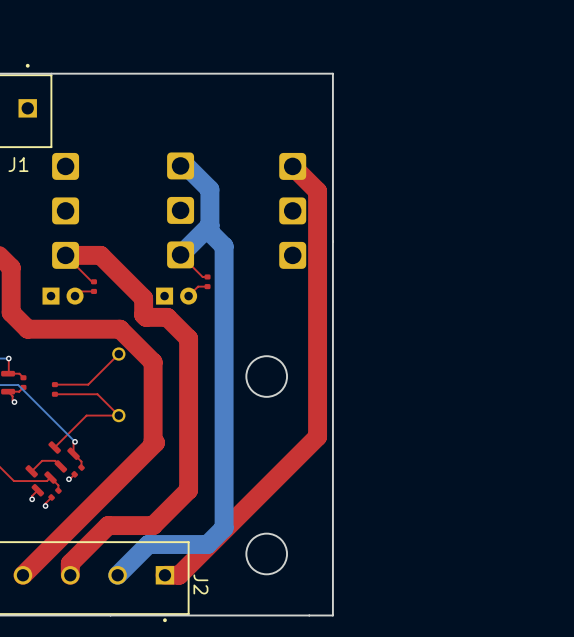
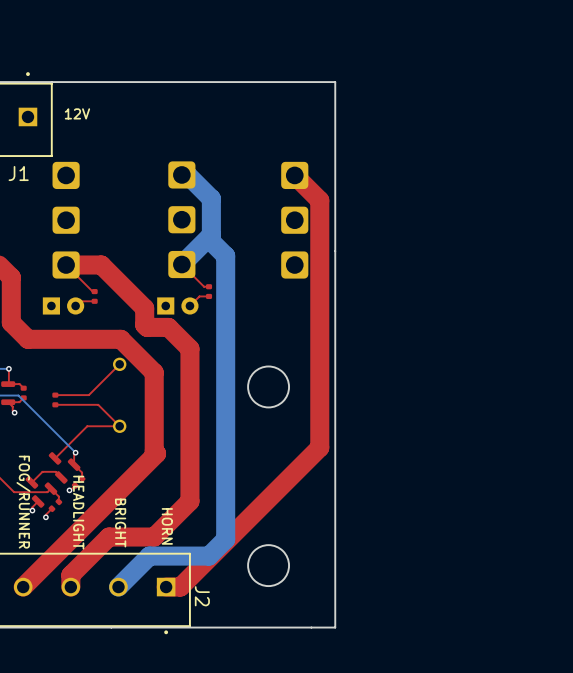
text: none -> 12V (77, 113)
text: none -> FOG/RUNNER (23, 502)
text: none -> HEADLIGHT (78, 512)
text: none -> BRIGHT (120, 523)
text: none -> HORN (167, 526)

